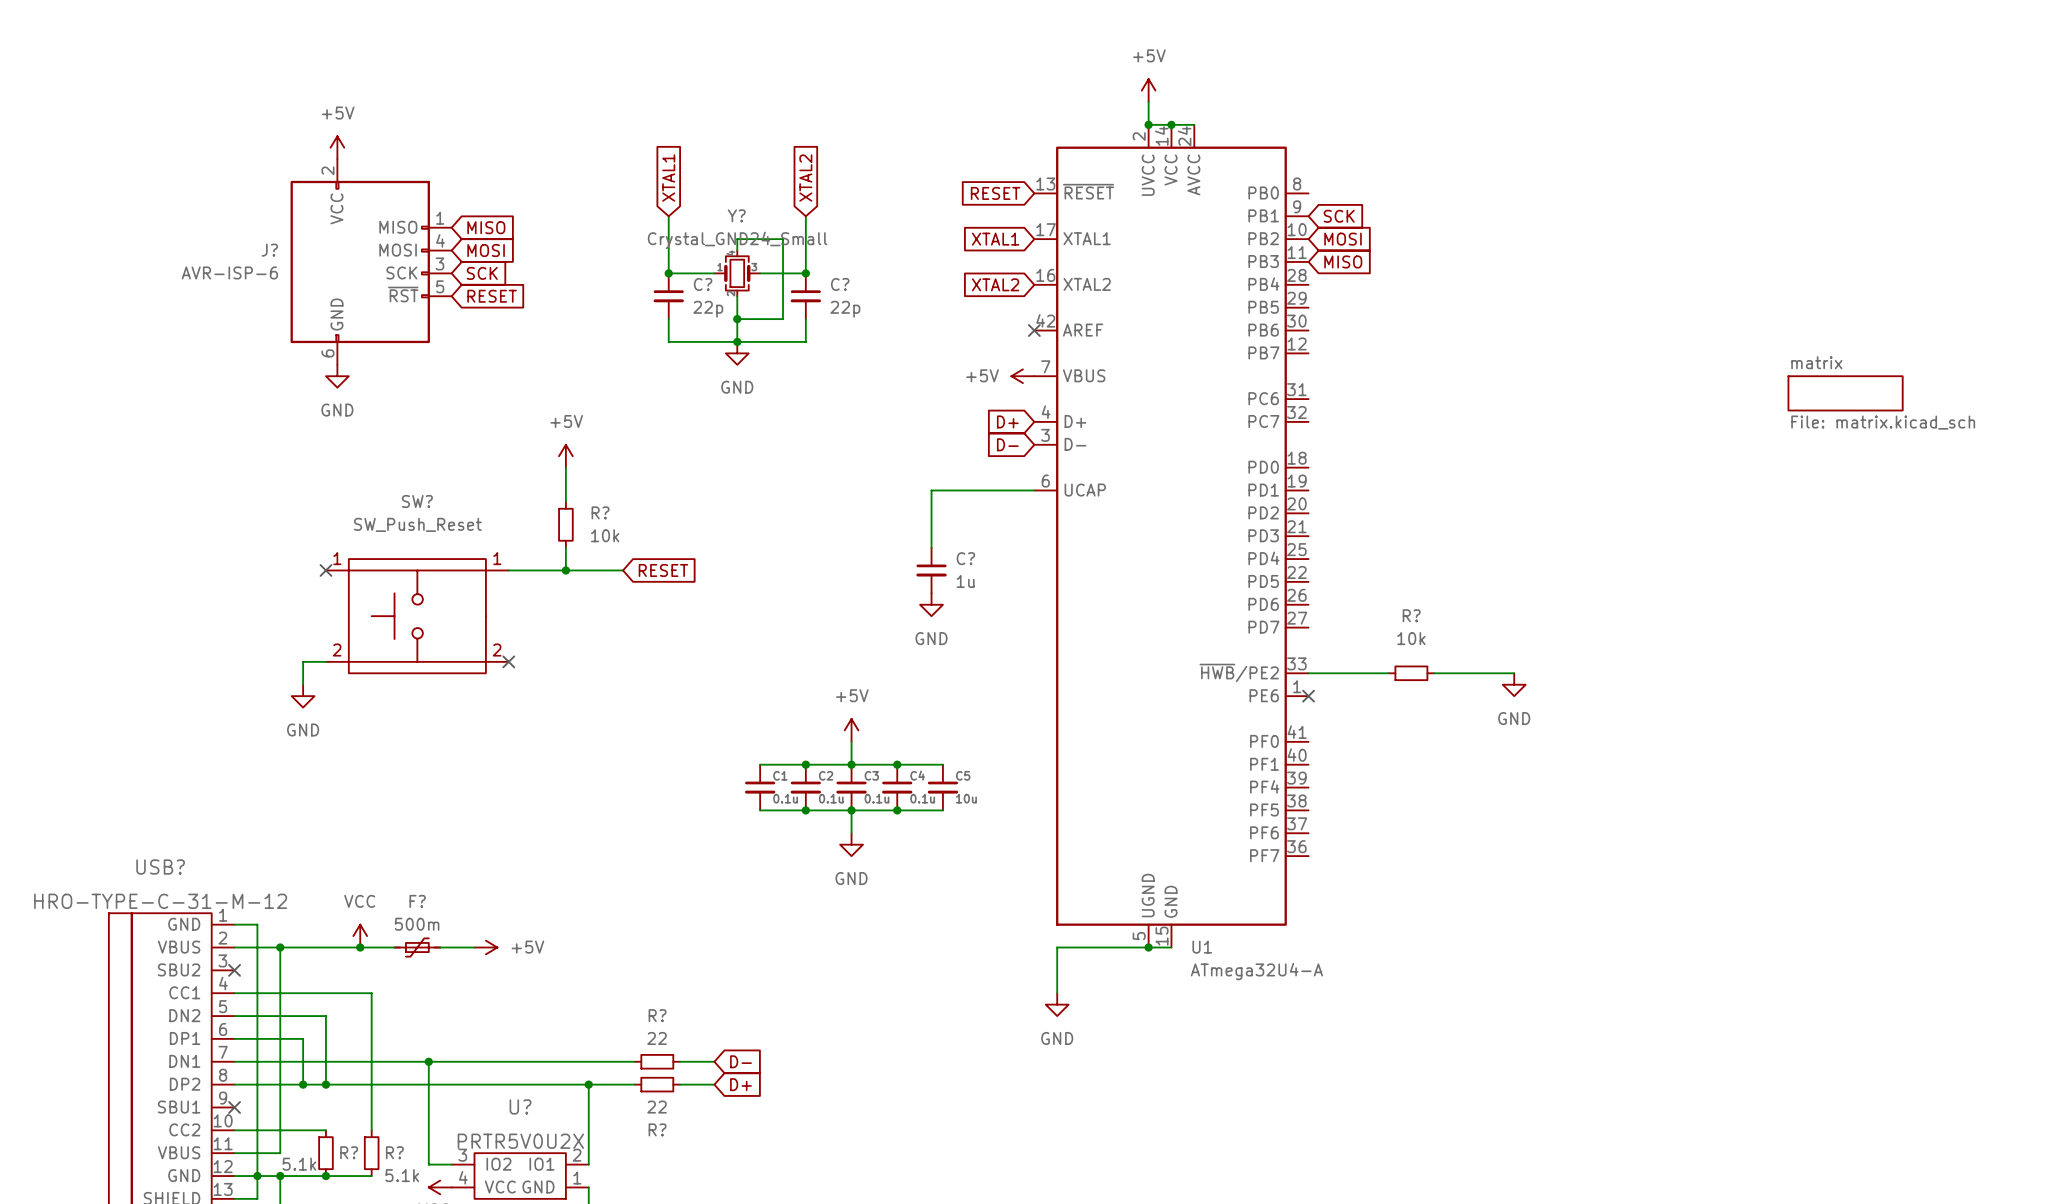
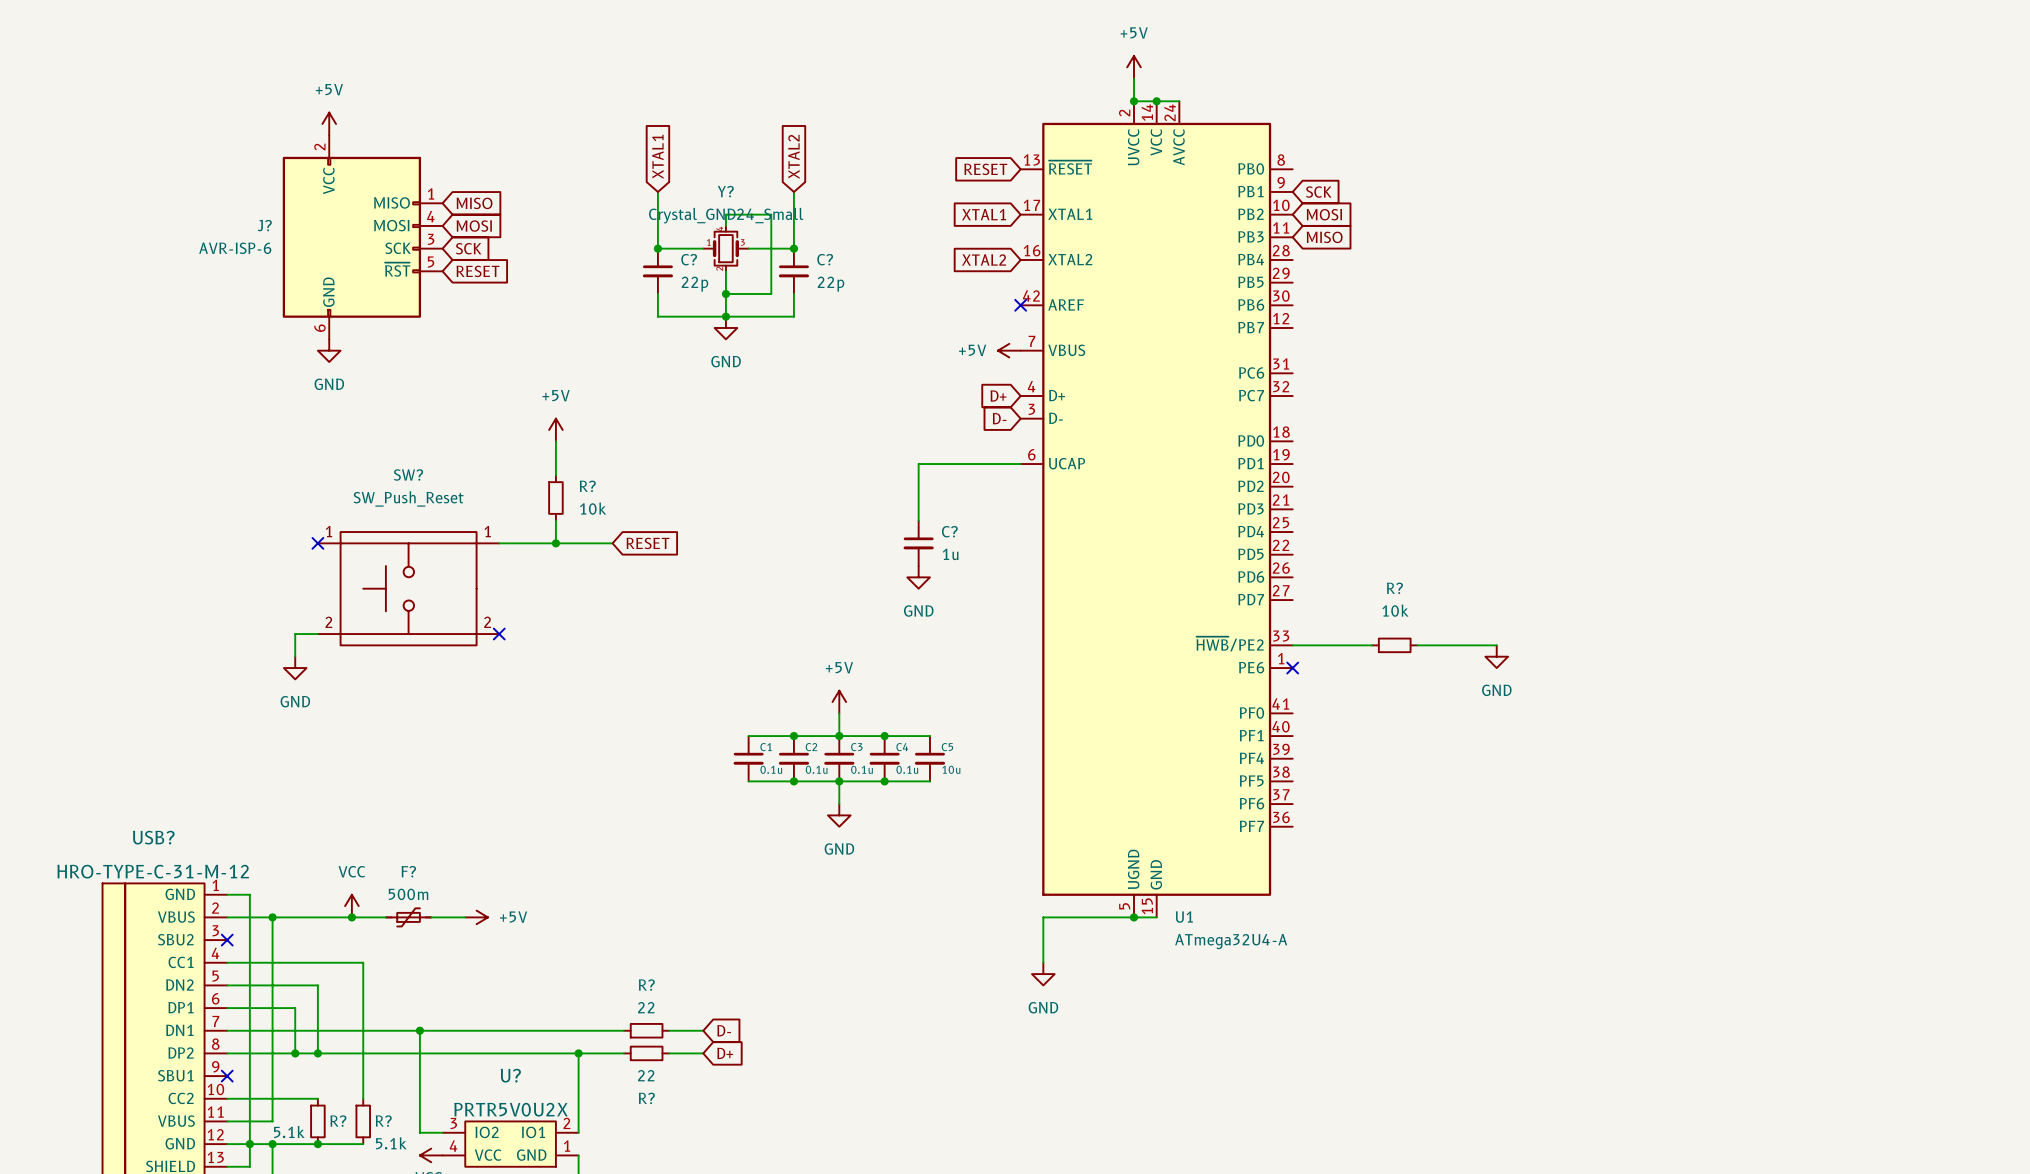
sheet matrix: File: matrix.kicad_sch (1845, 393) -> none

